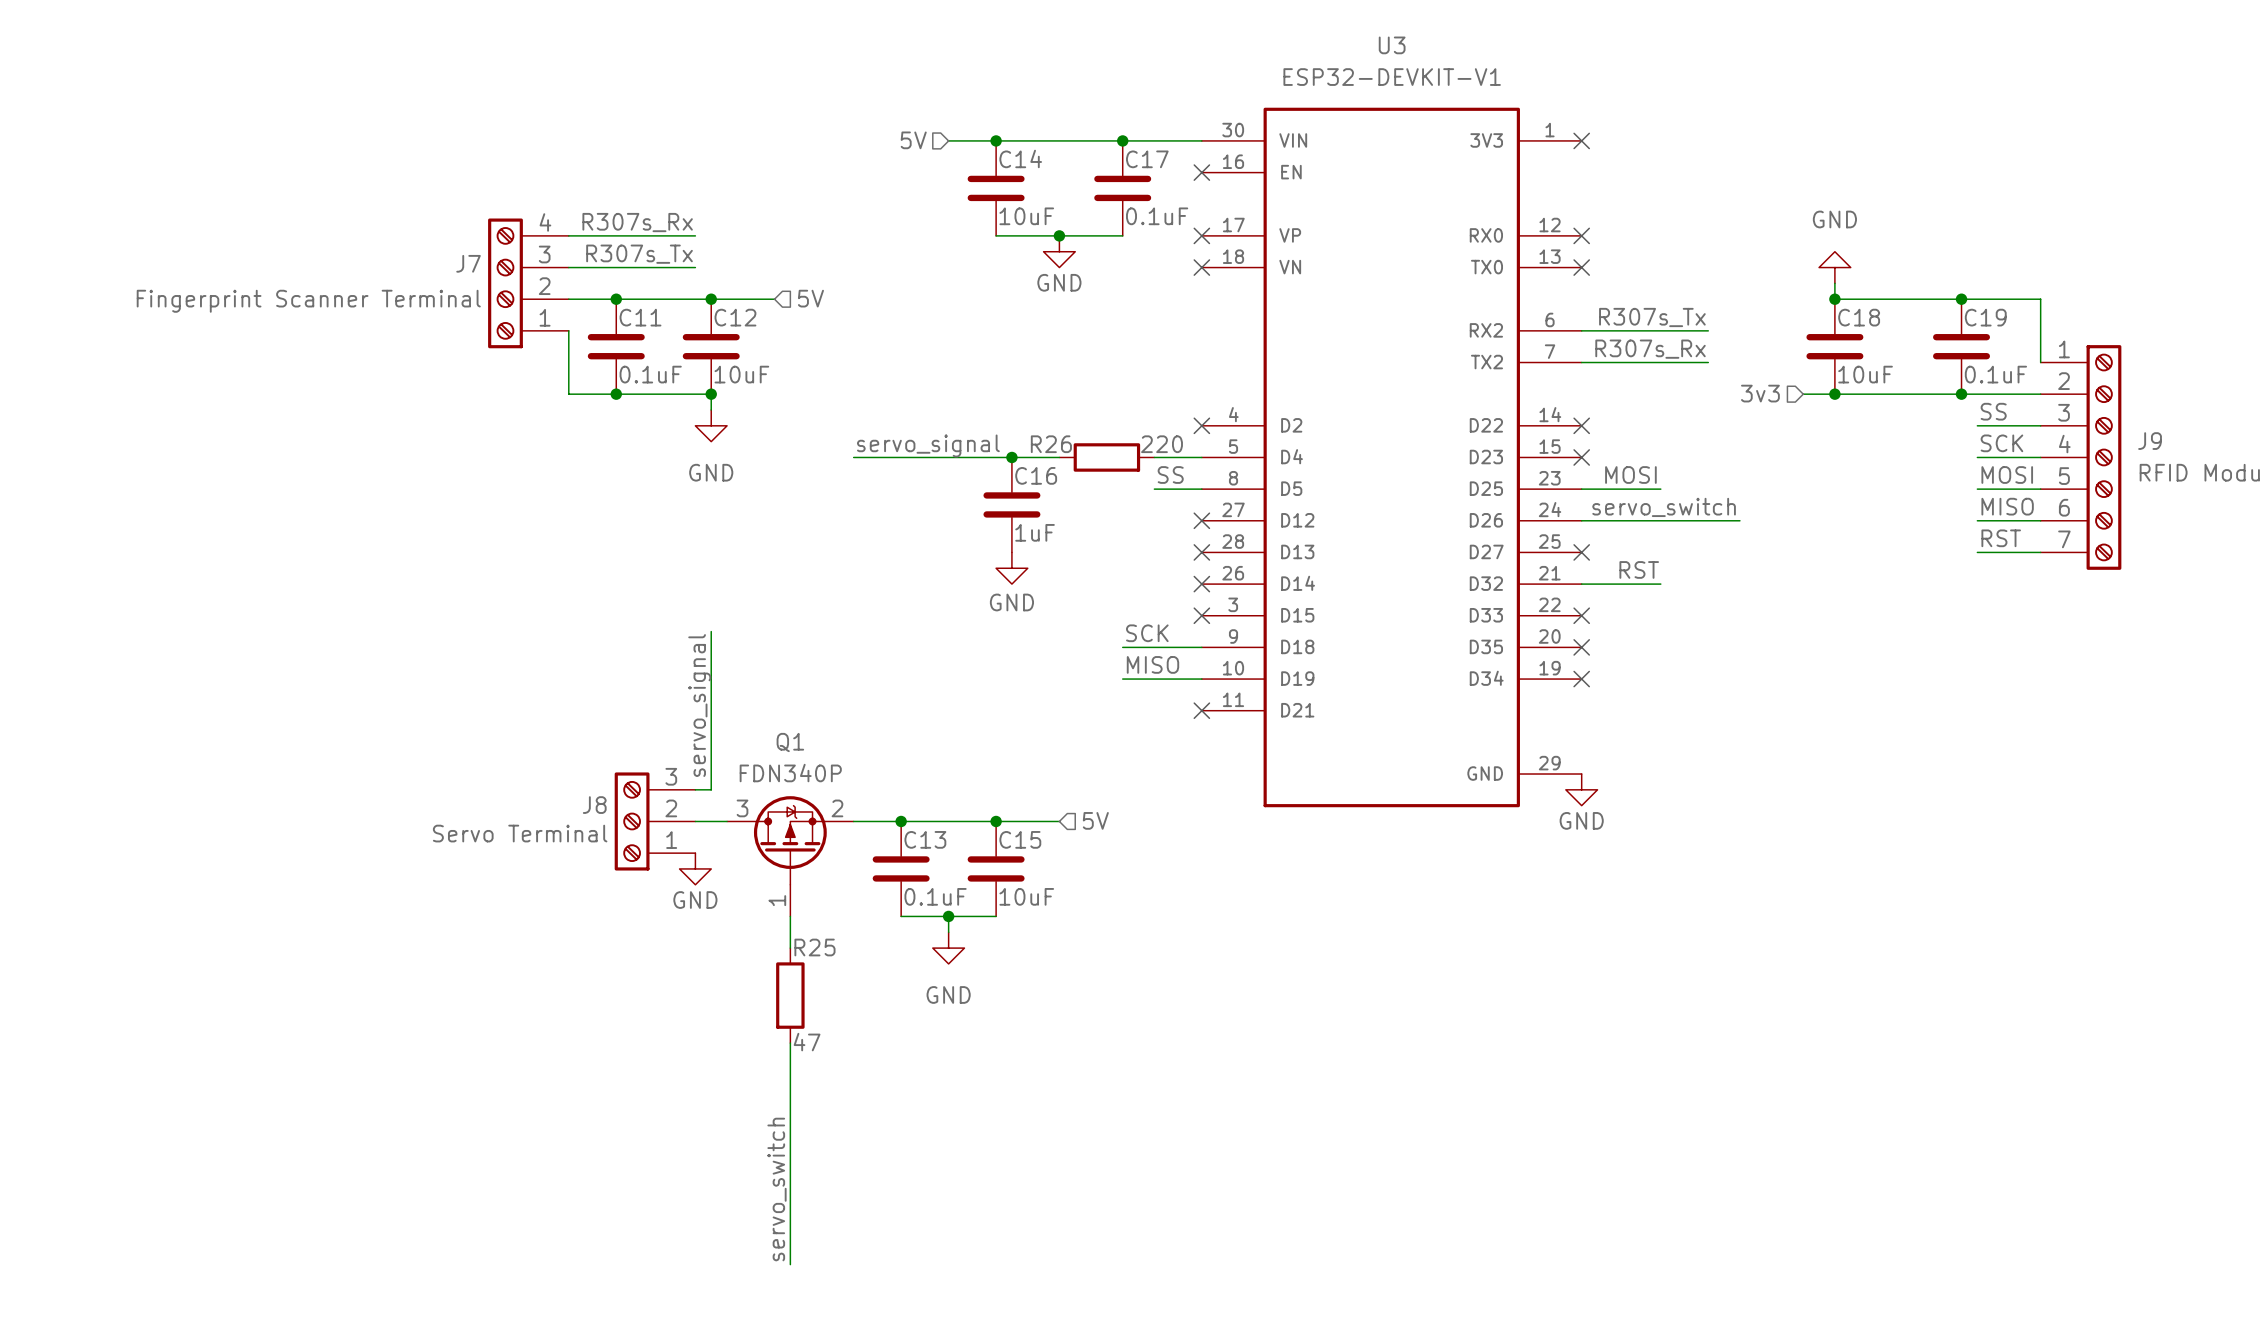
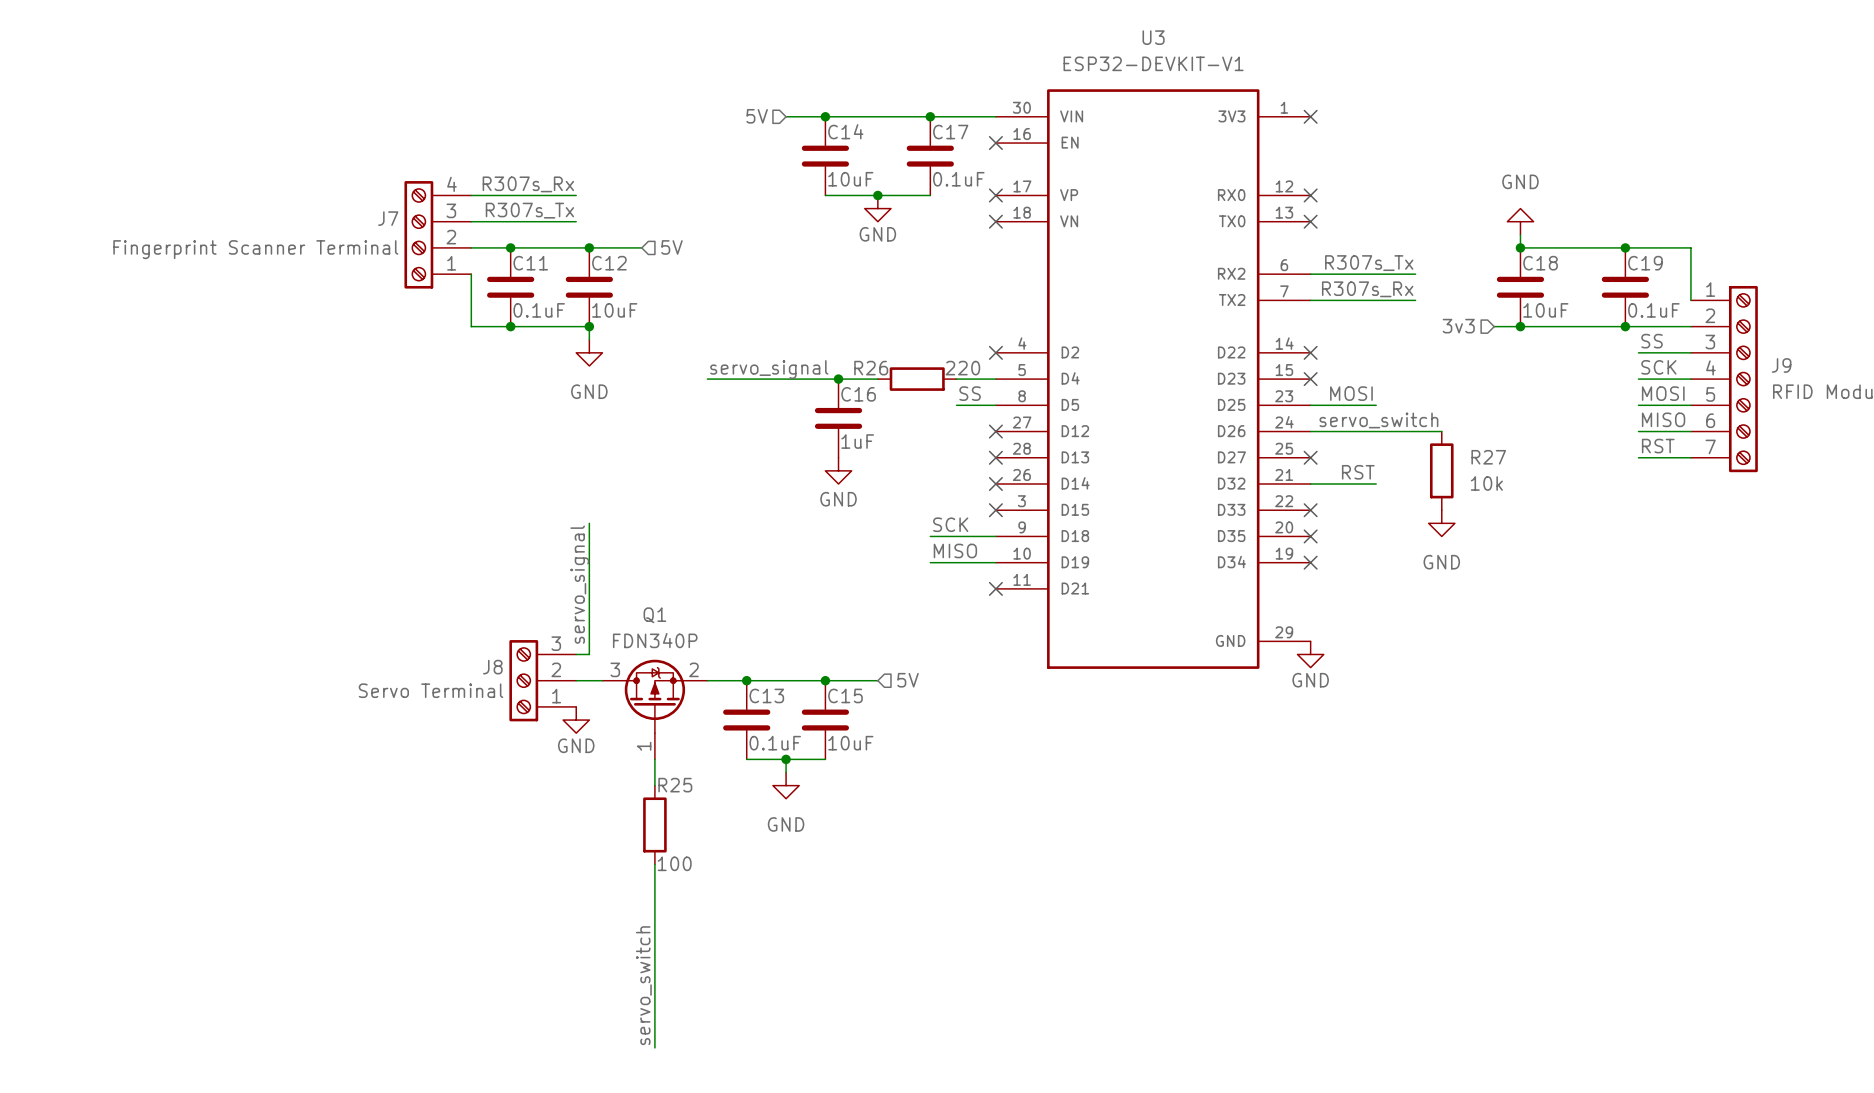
R27: none -> 10k (1441, 470)
power symbol: none -> GND (1441, 523)
R25 value: 47 (807, 1042) -> 100 (674, 863)

